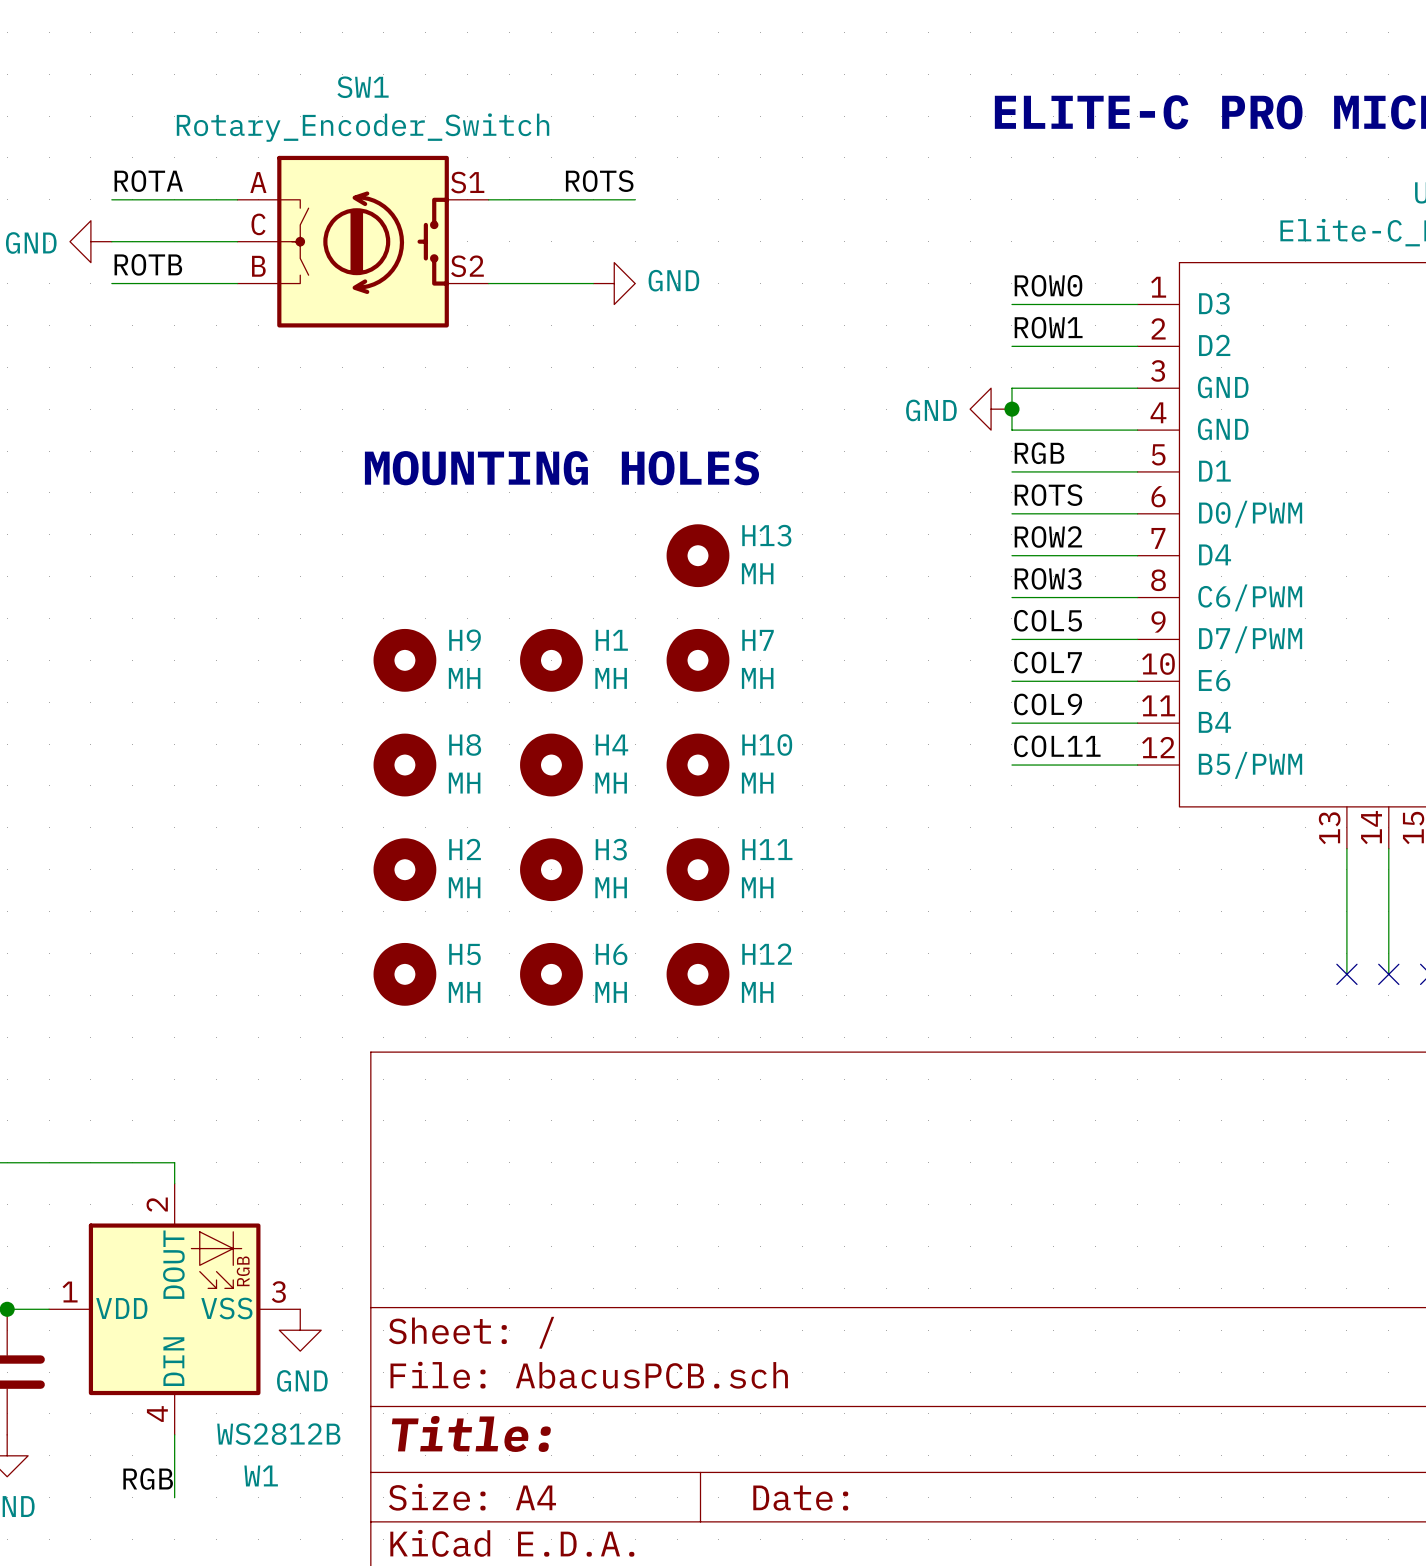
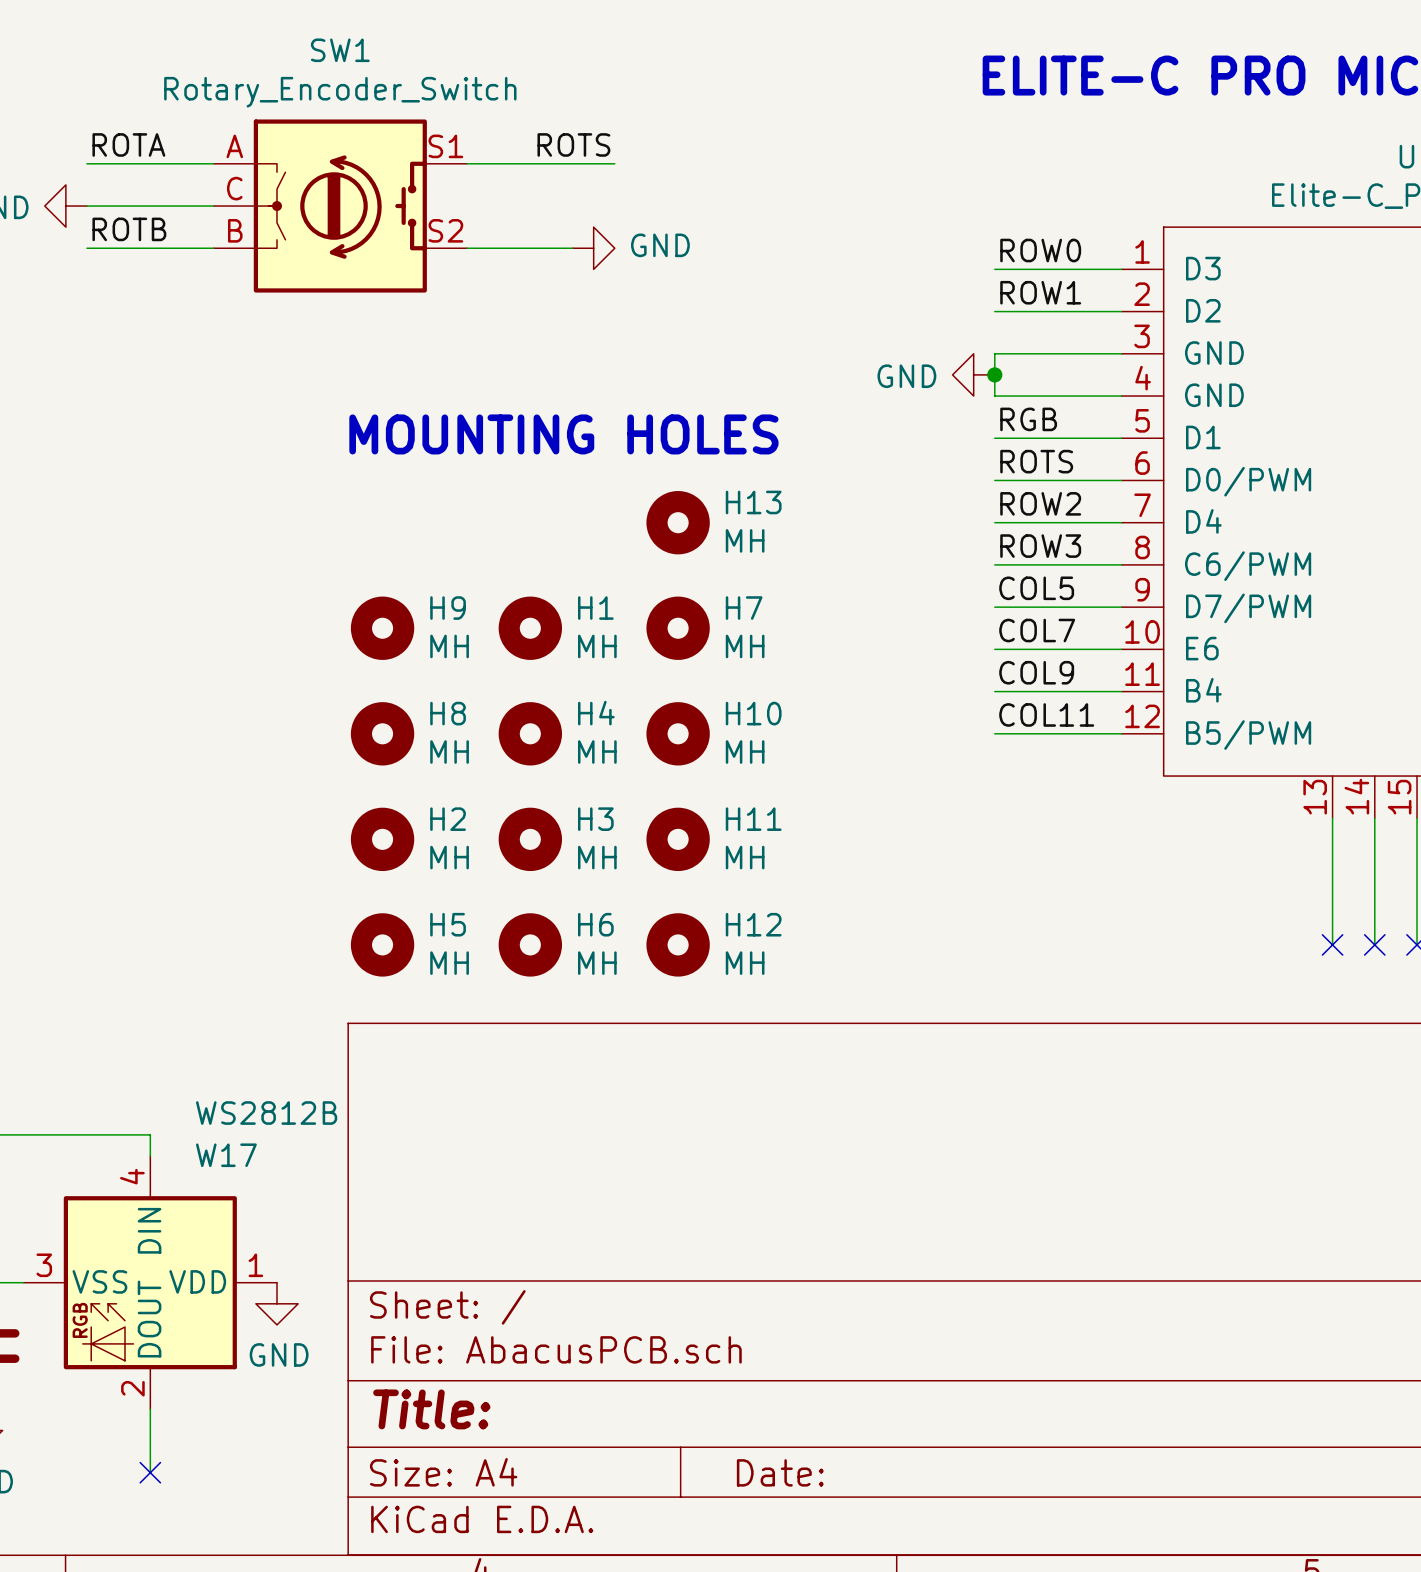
W1: WS2812B (174, 1309) -> none
W17: none -> WS2812B (150, 1282)
label: RGB (148, 1479) -> none
no-connect mark: none -> (150, 1472)

